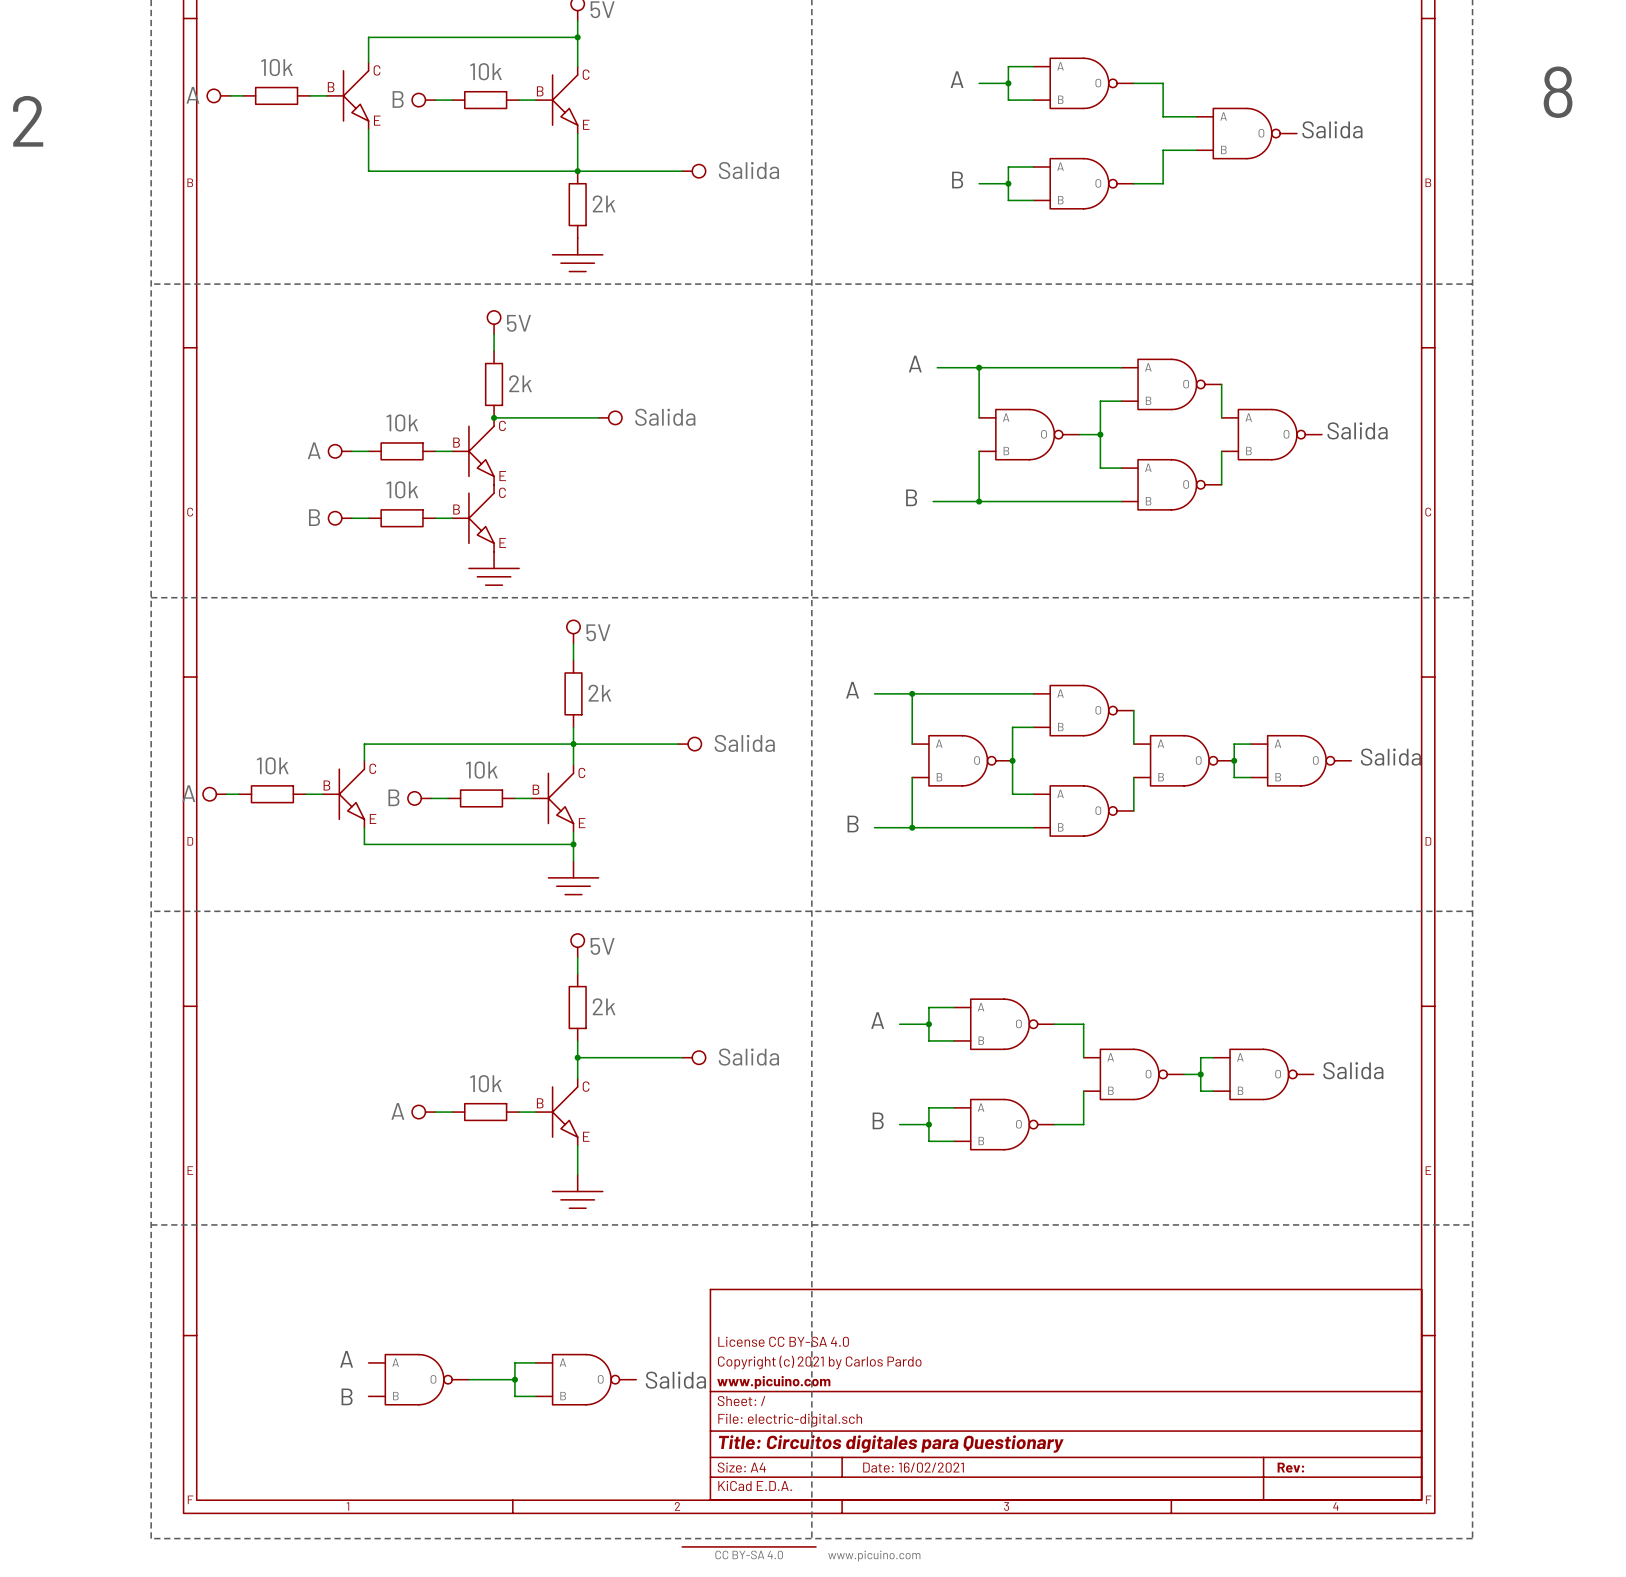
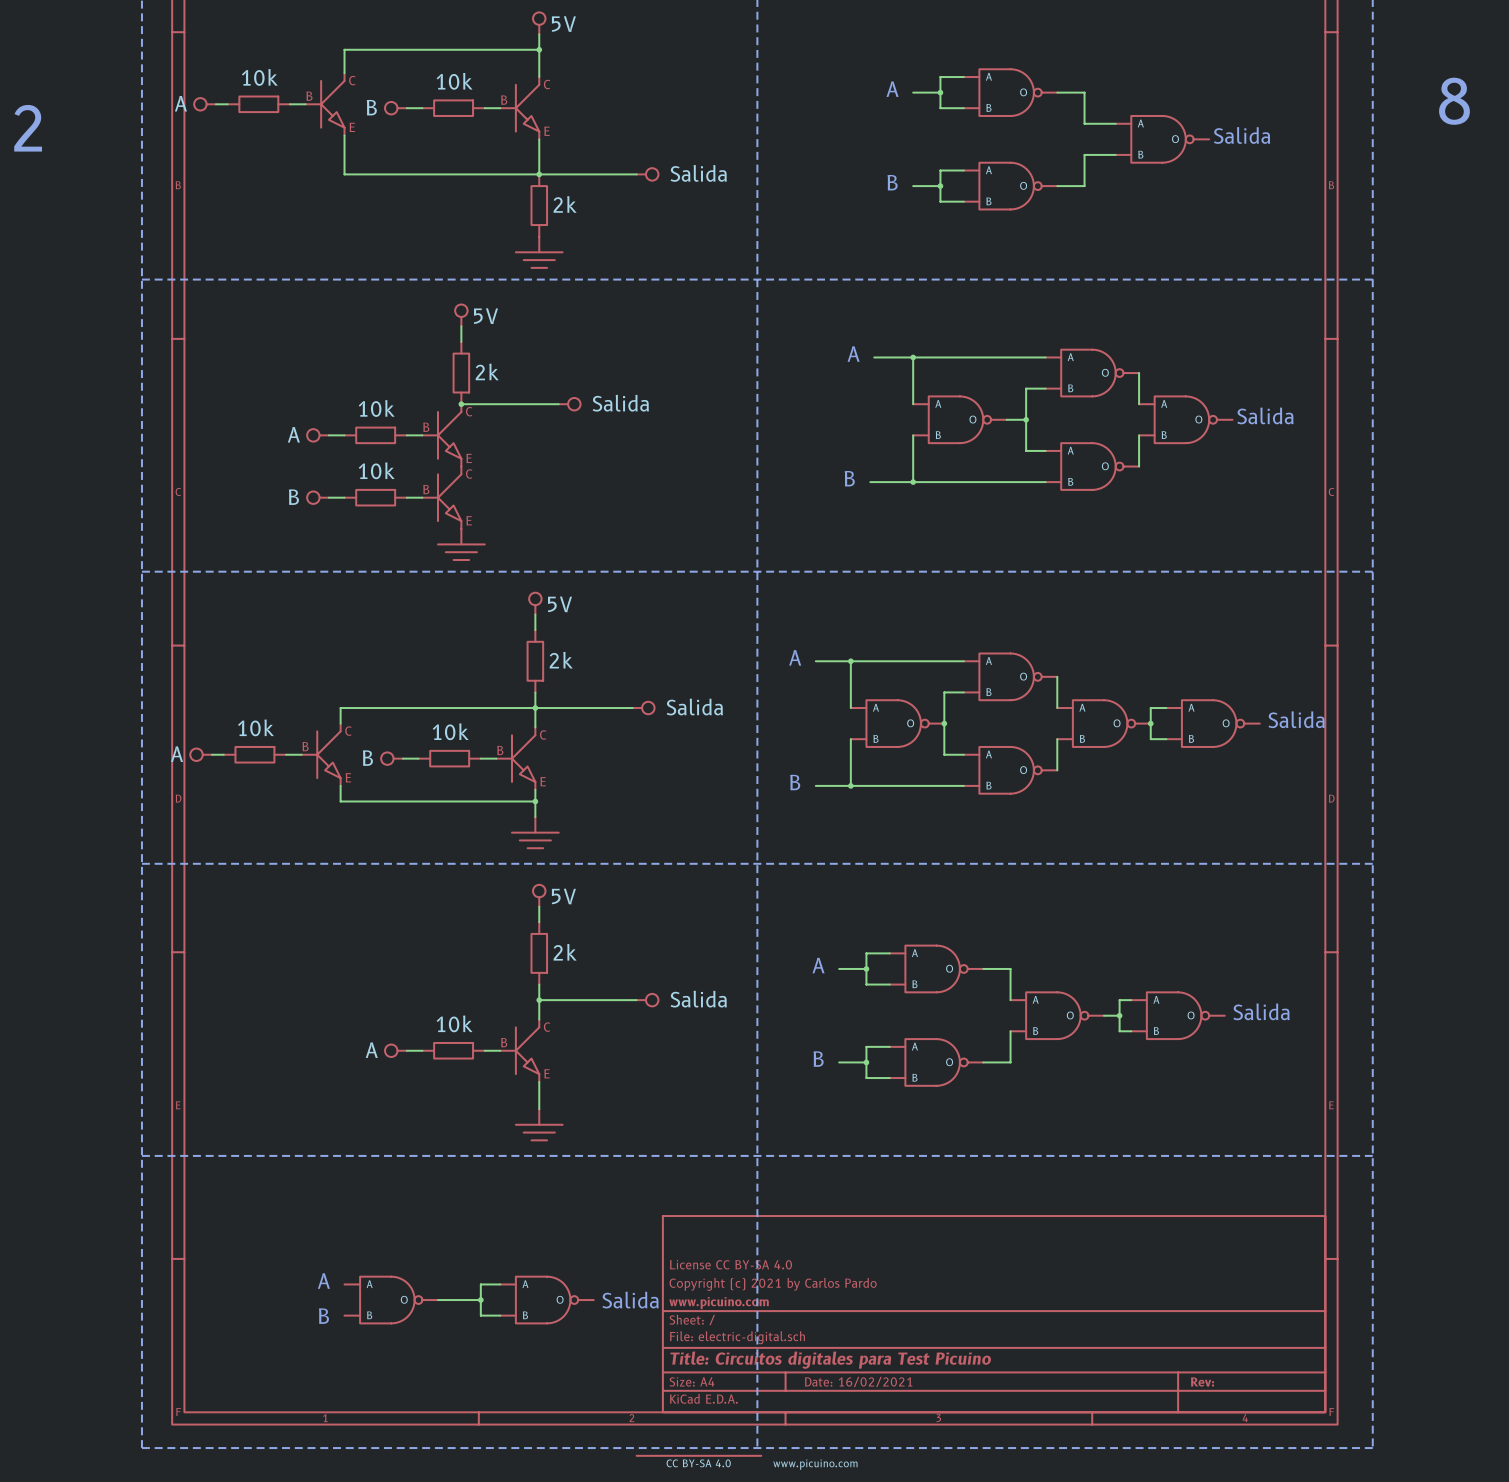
title block: Title: Circuitos digitales para Questionary (891, 1444) -> Title: Circuitos digitales para Test Picuino (830, 1360)

